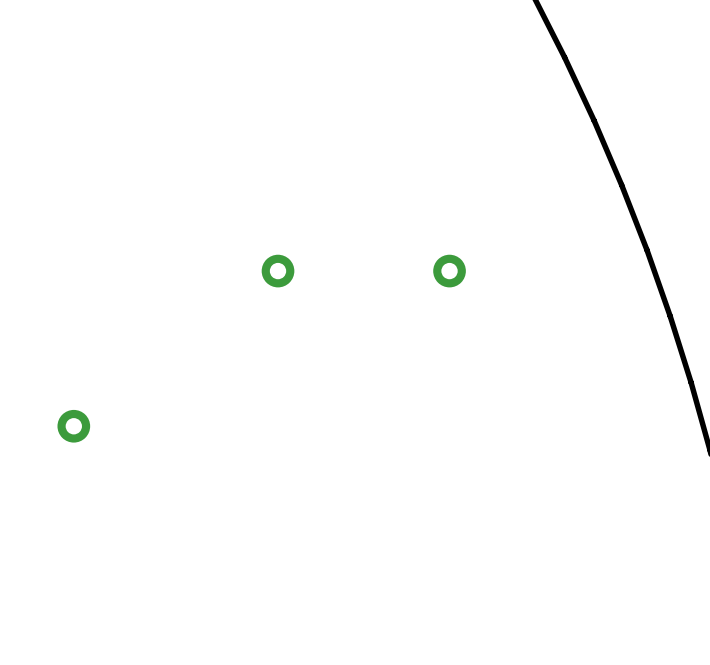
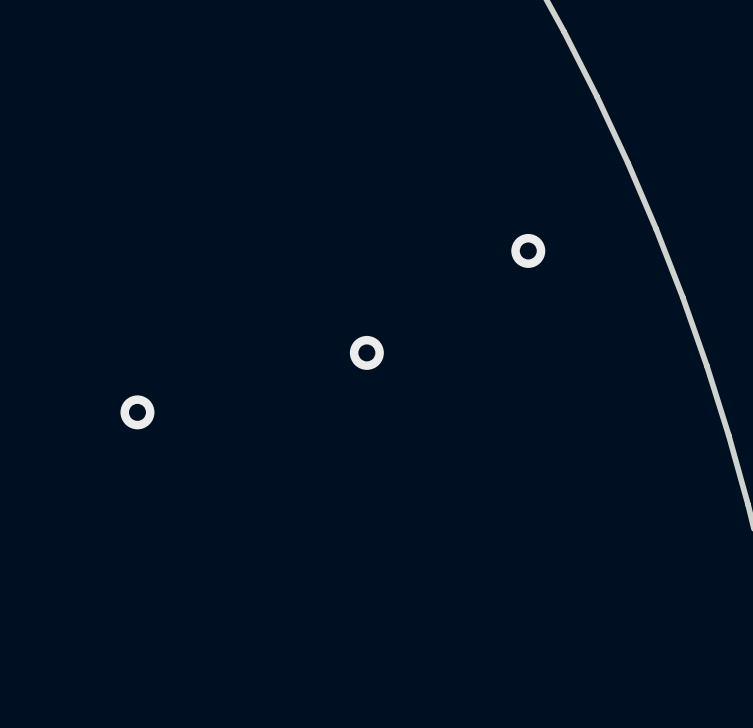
via: none -> (528, 250)
via: (278, 271) -> none
via: (449, 271) -> none
via: none -> (366, 352)
via: none -> (137, 412)
via: (73, 426) -> none

